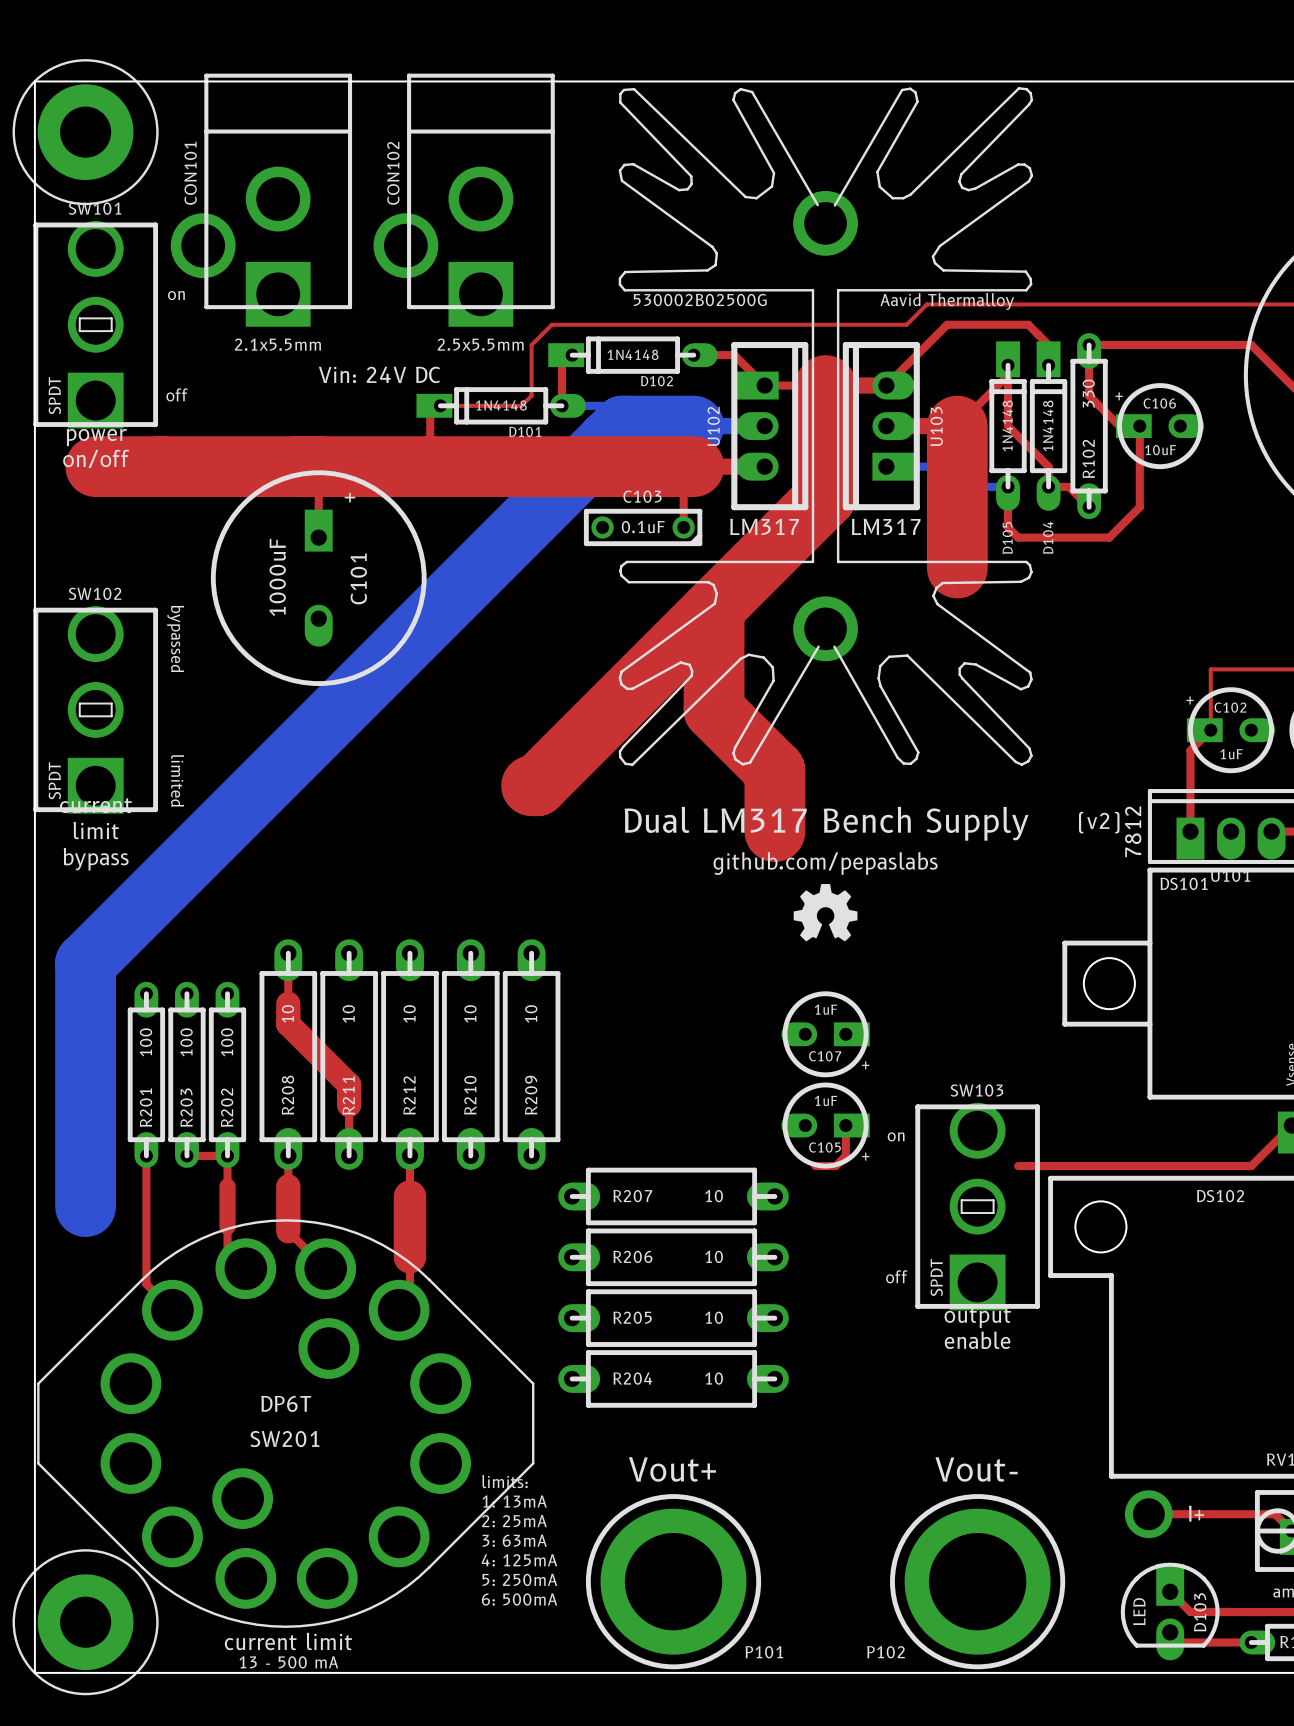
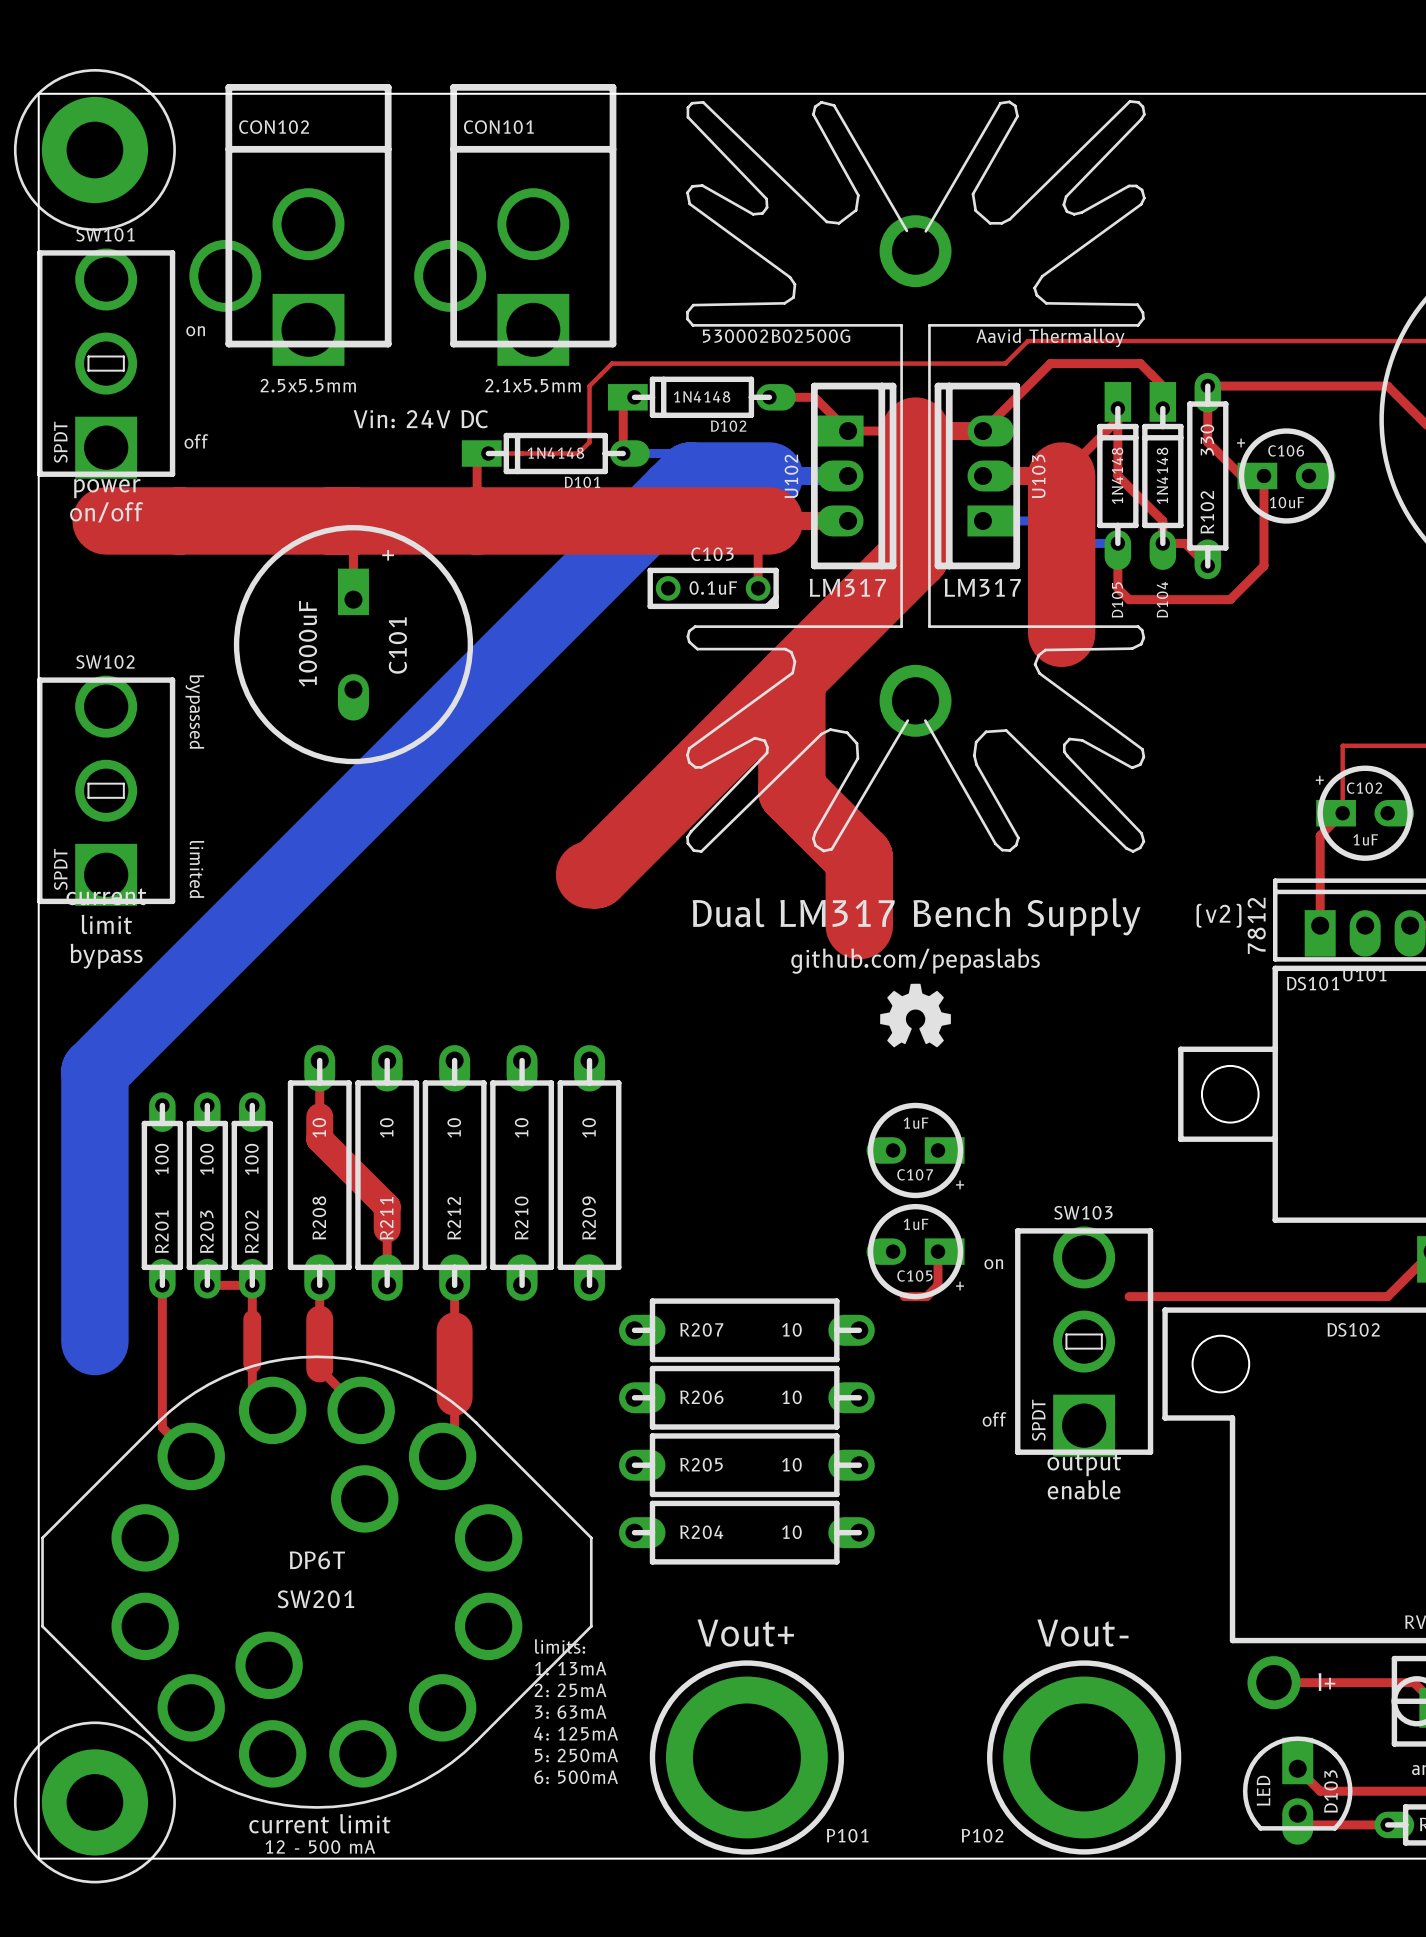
CON101 footprint: [170, 73, 353, 327] -> [414, 83, 617, 366]
CON102 footprint: [373, 73, 555, 327] -> [189, 83, 392, 366]
CON101 name position: CON101 (190, 173) -> CON101 (498, 127)
CON102 name position: CON102 (393, 173) -> CON102 (274, 127)
text: 13 - 500 mA (288, 1662) -> 12 - 500 mA (320, 1846)

